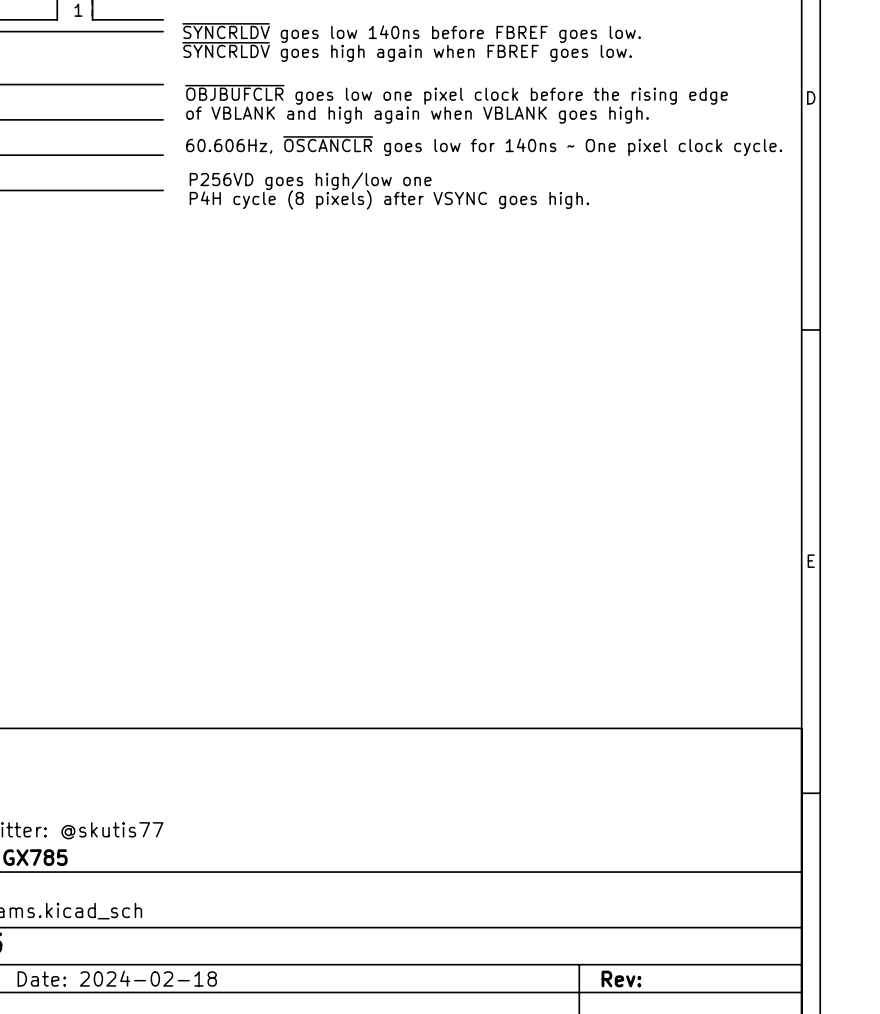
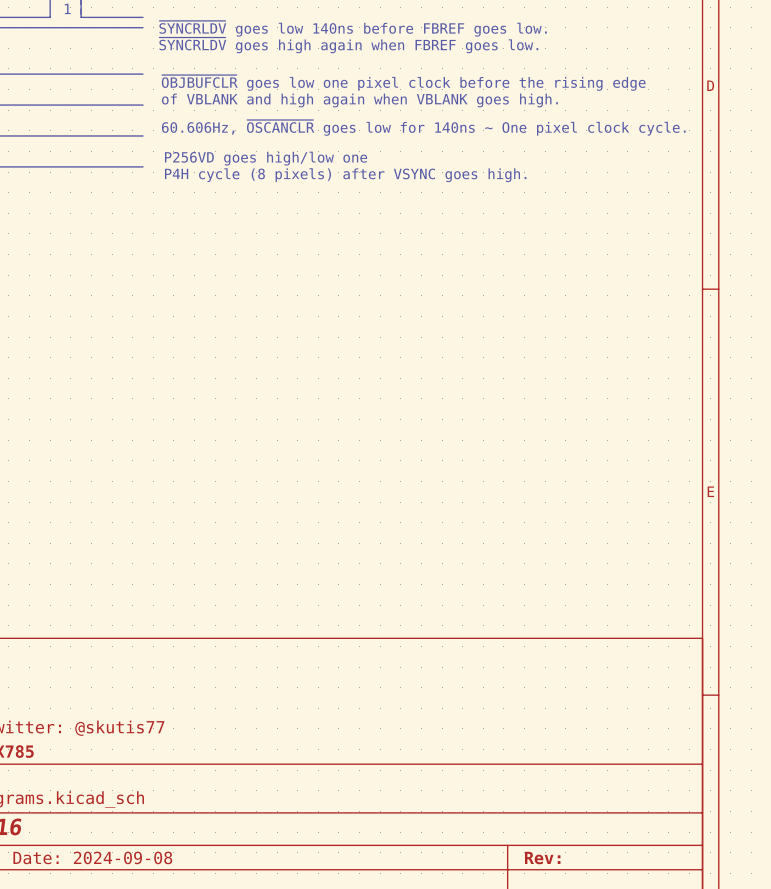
title block: Date: 2024-02-18 (117, 978) -> Date: 2024-09-08 (92, 857)

